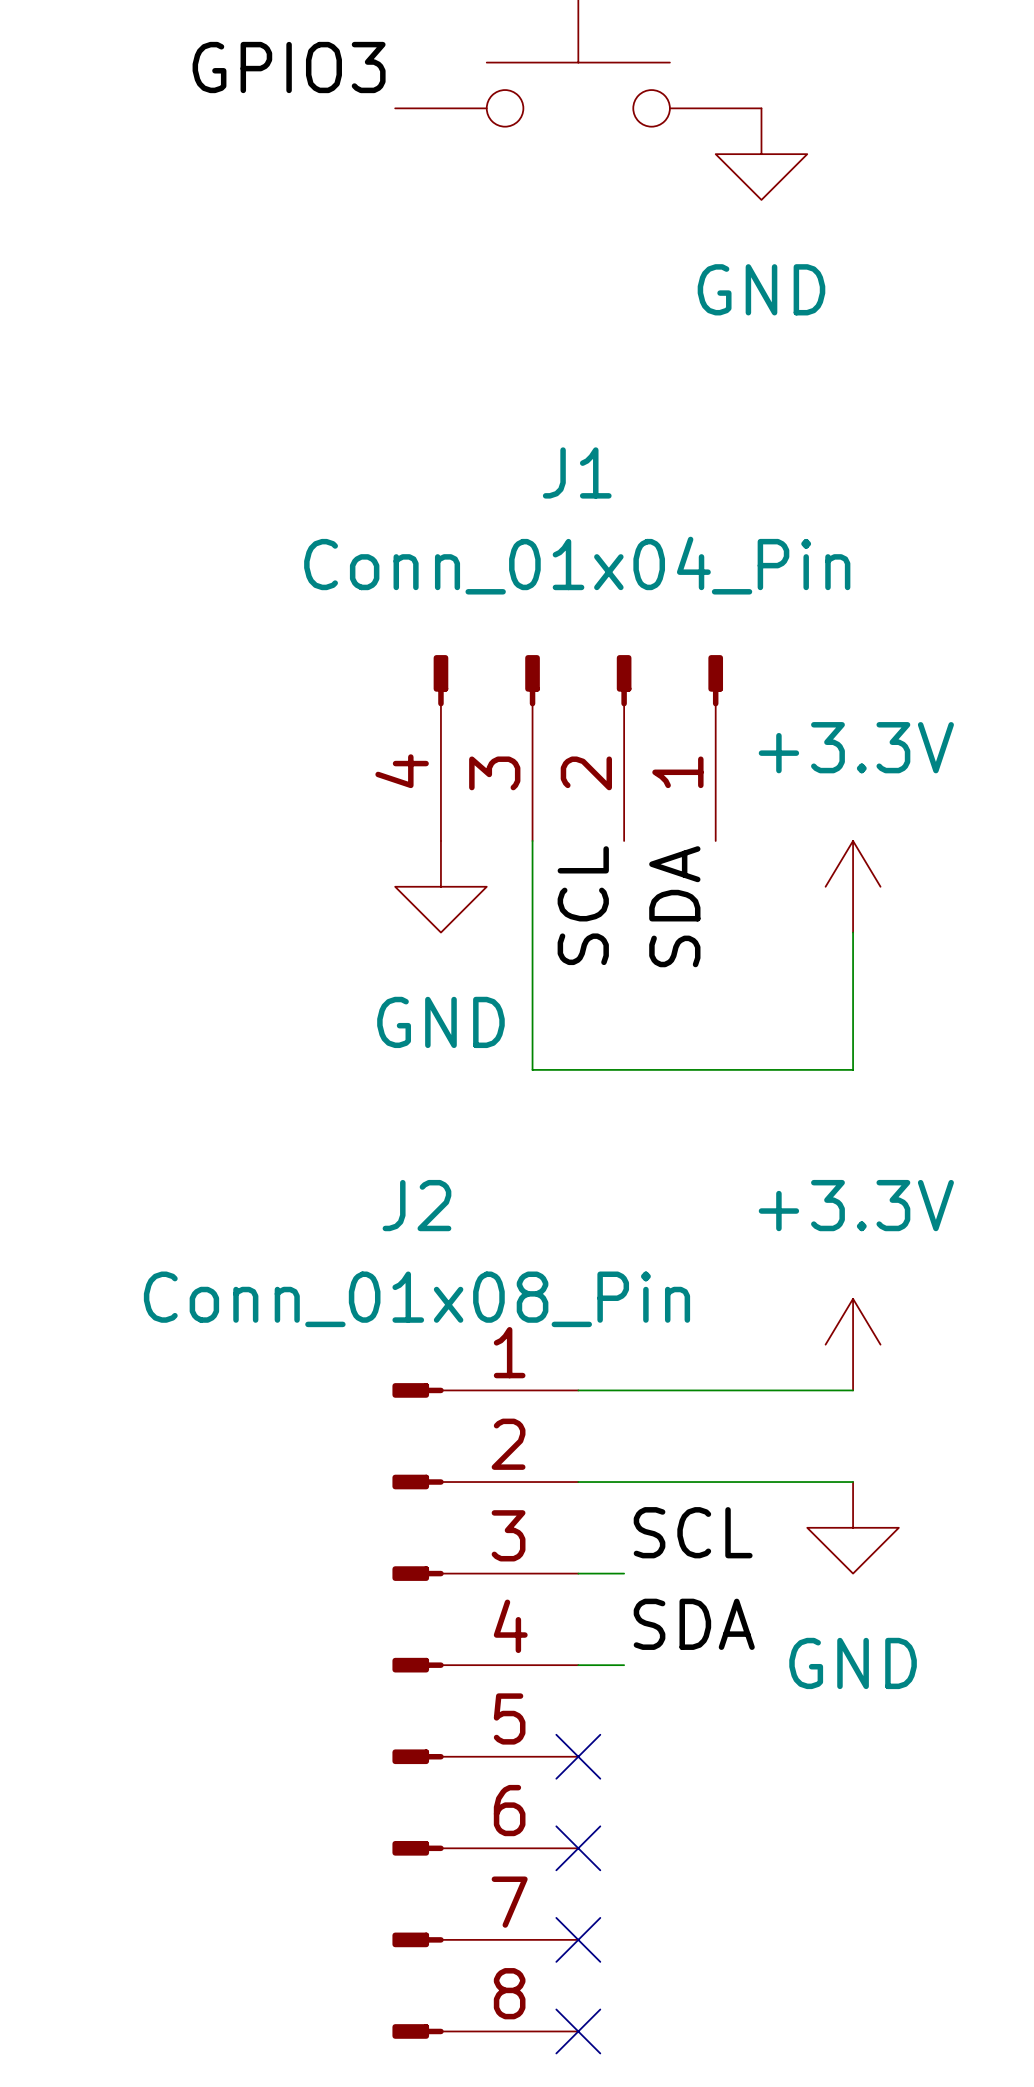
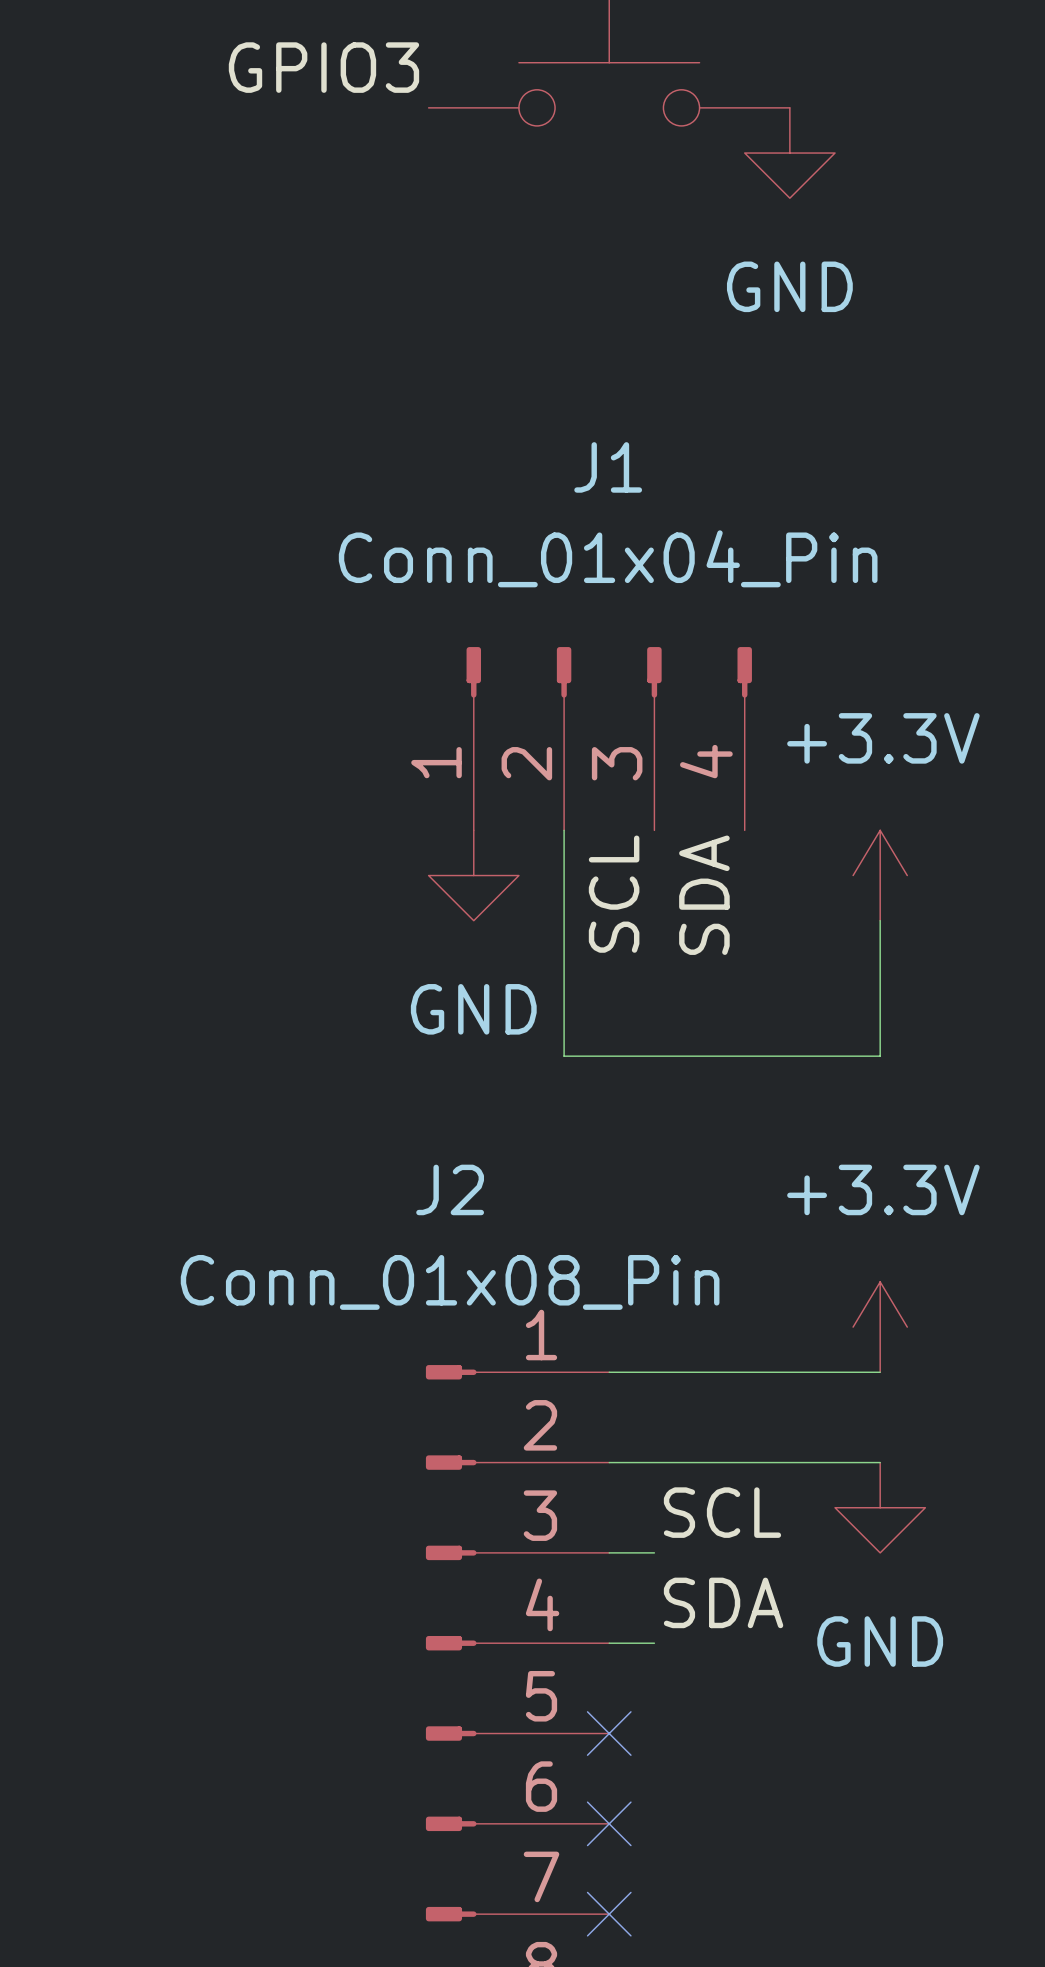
J1 flip: as is (578, 680) -> left-right (609, 672)

